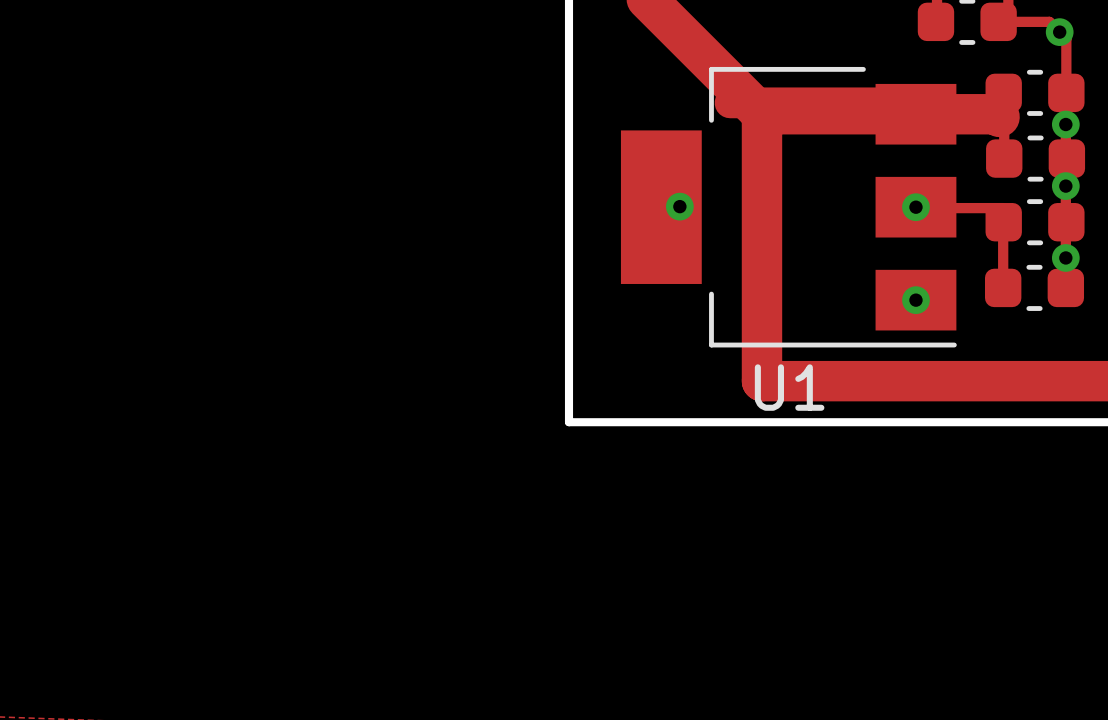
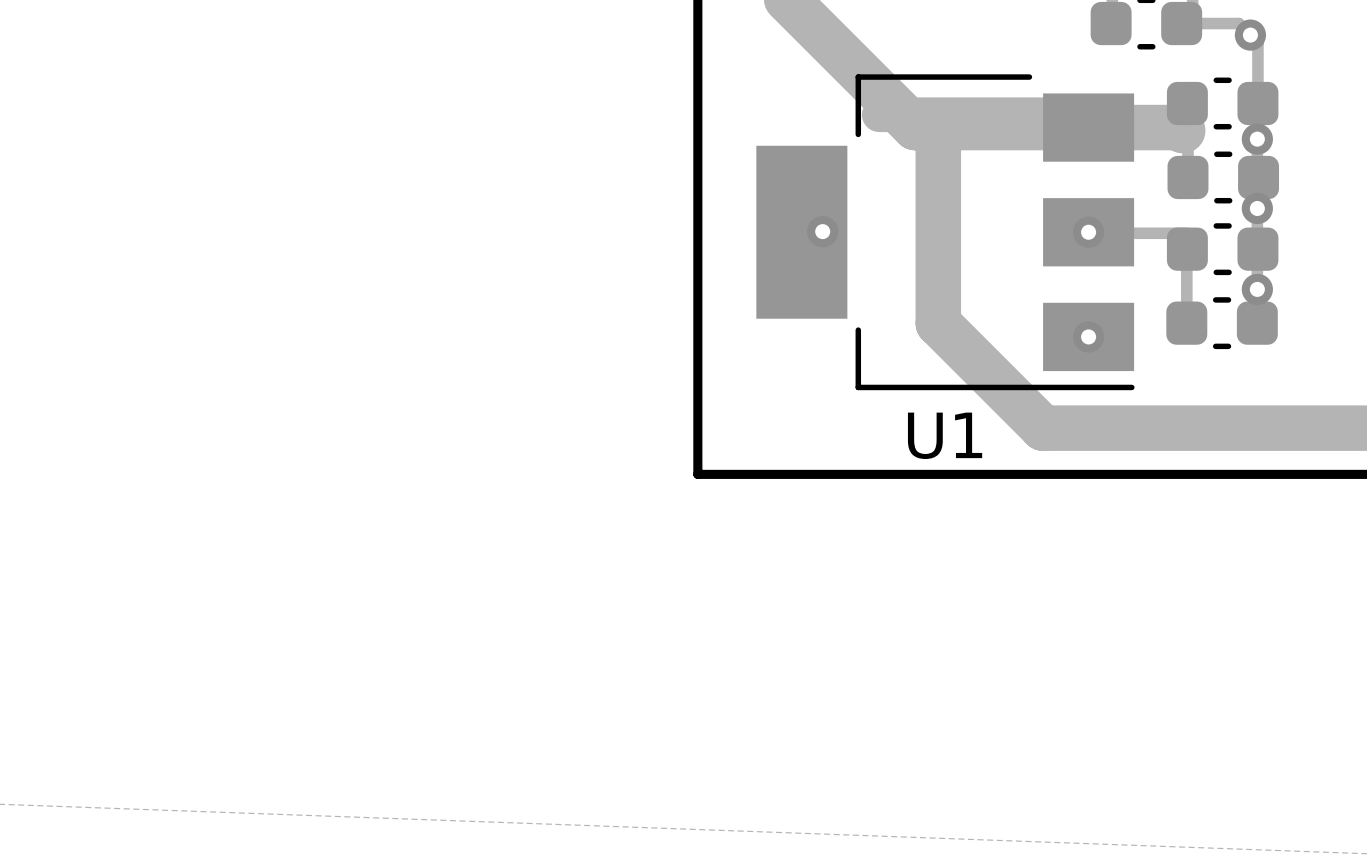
track: (761, 114) (761, 381) (875, 381) -> (938, 127) (938, 323) (1043, 428)

